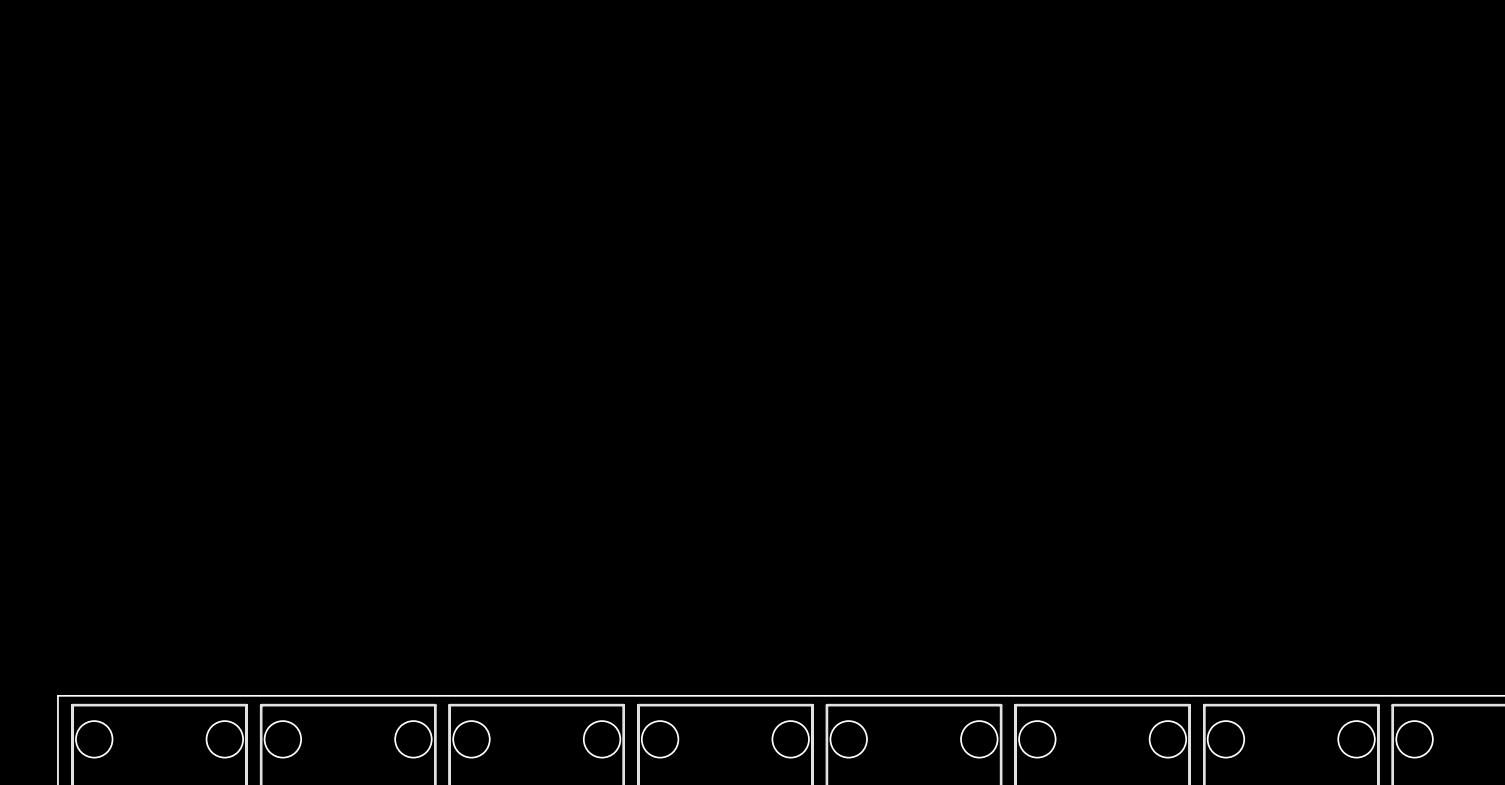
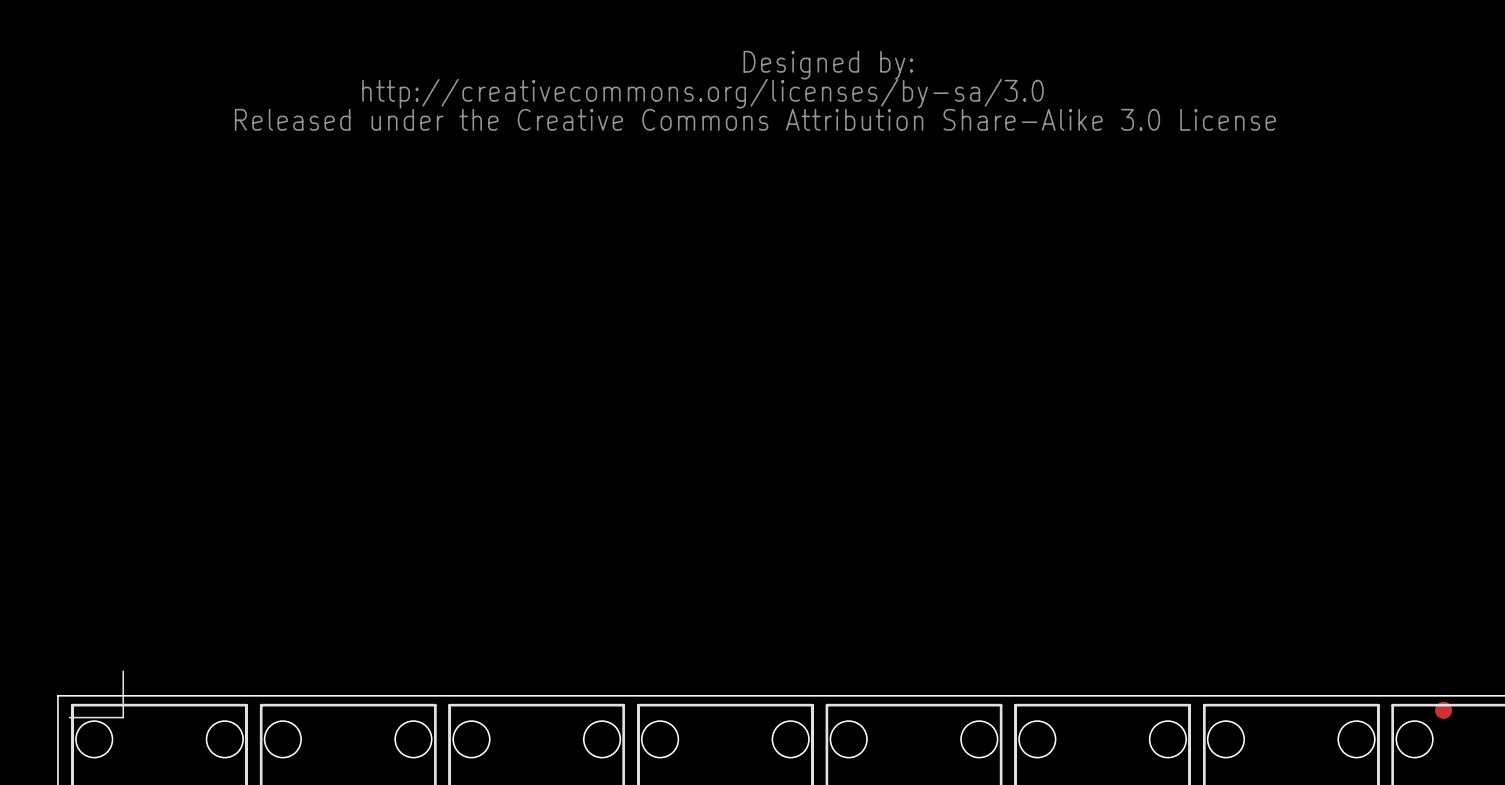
drawing: none -> [234, 50, 1276, 131]
line: none -> (123, 671) (123, 717) (69, 717)
part: none -> (1443, 710)

